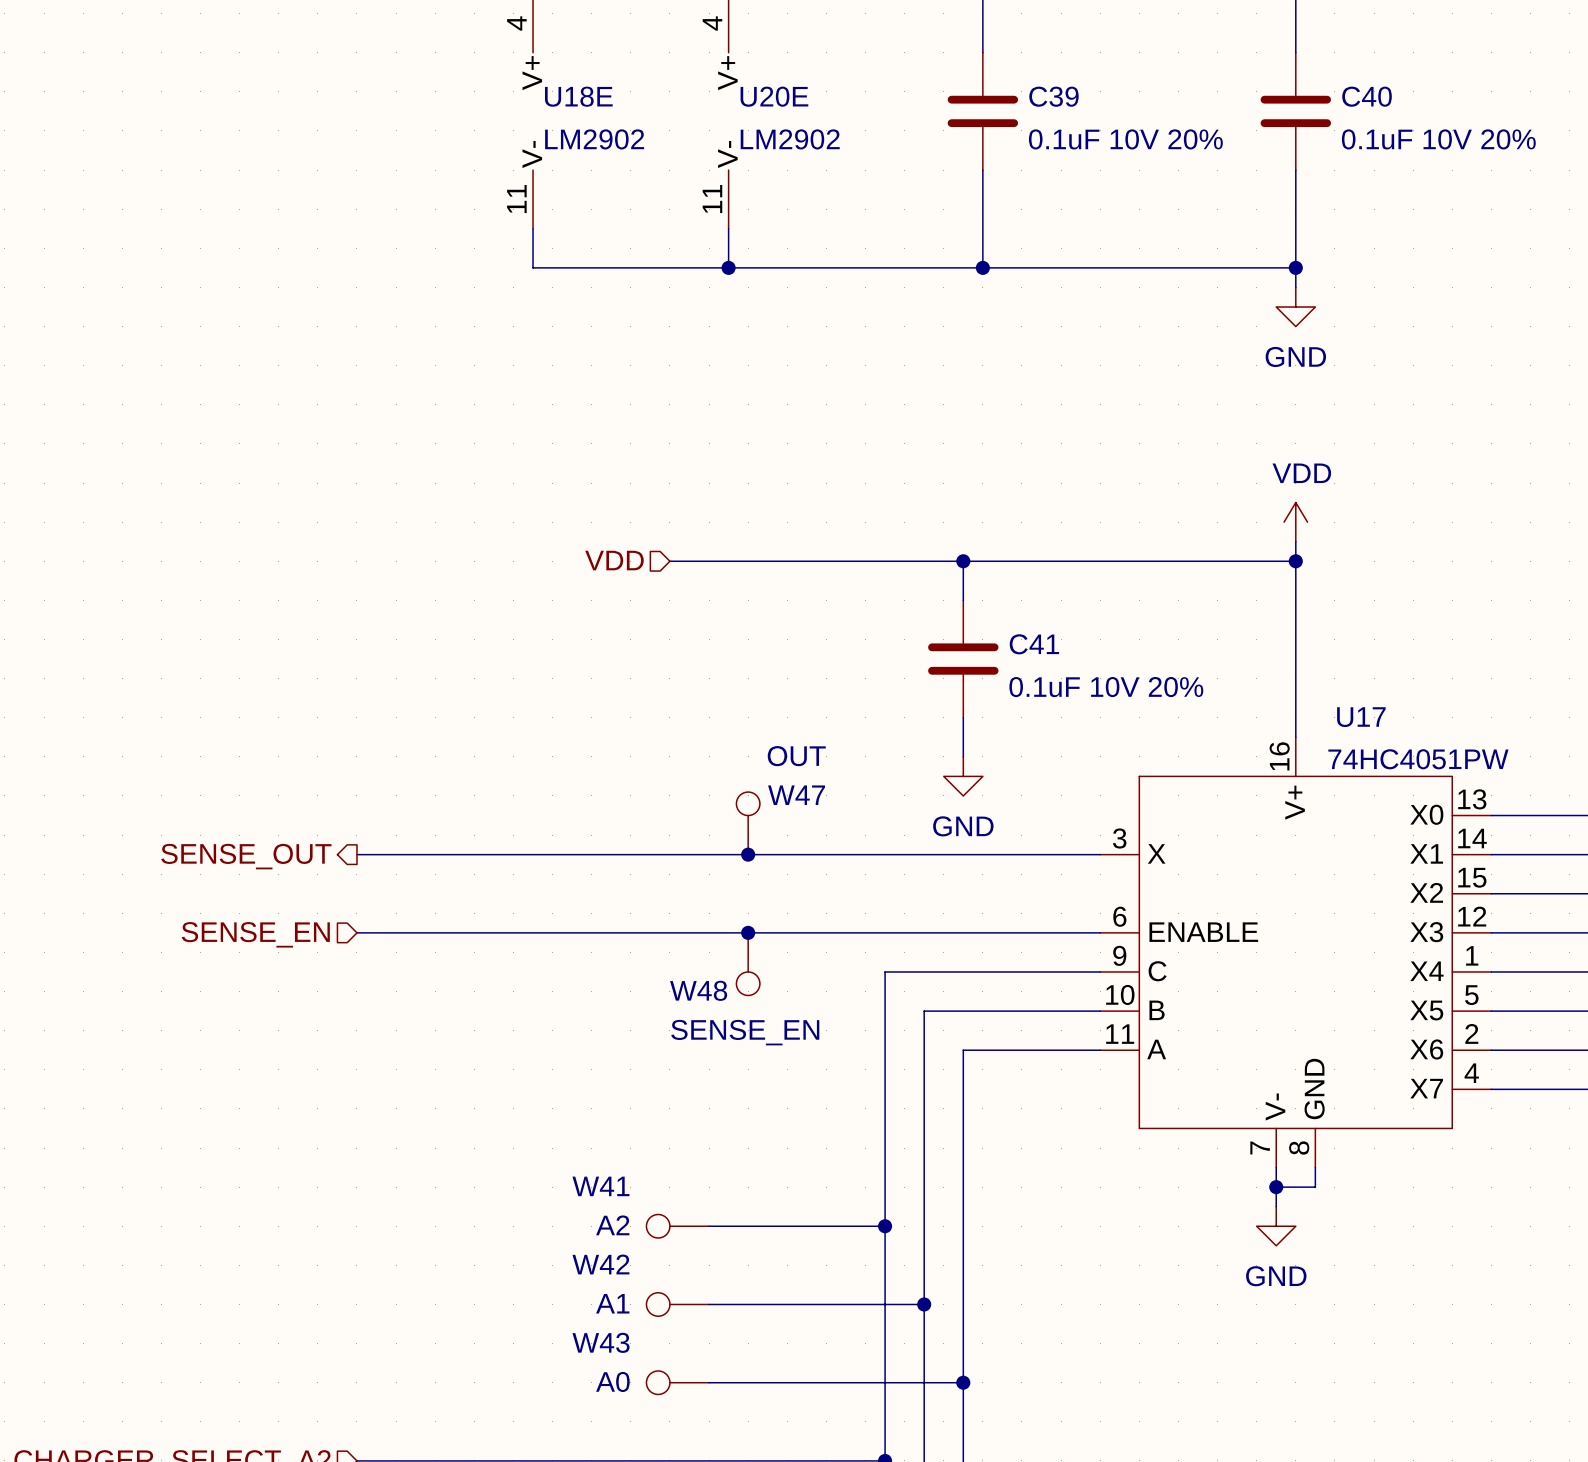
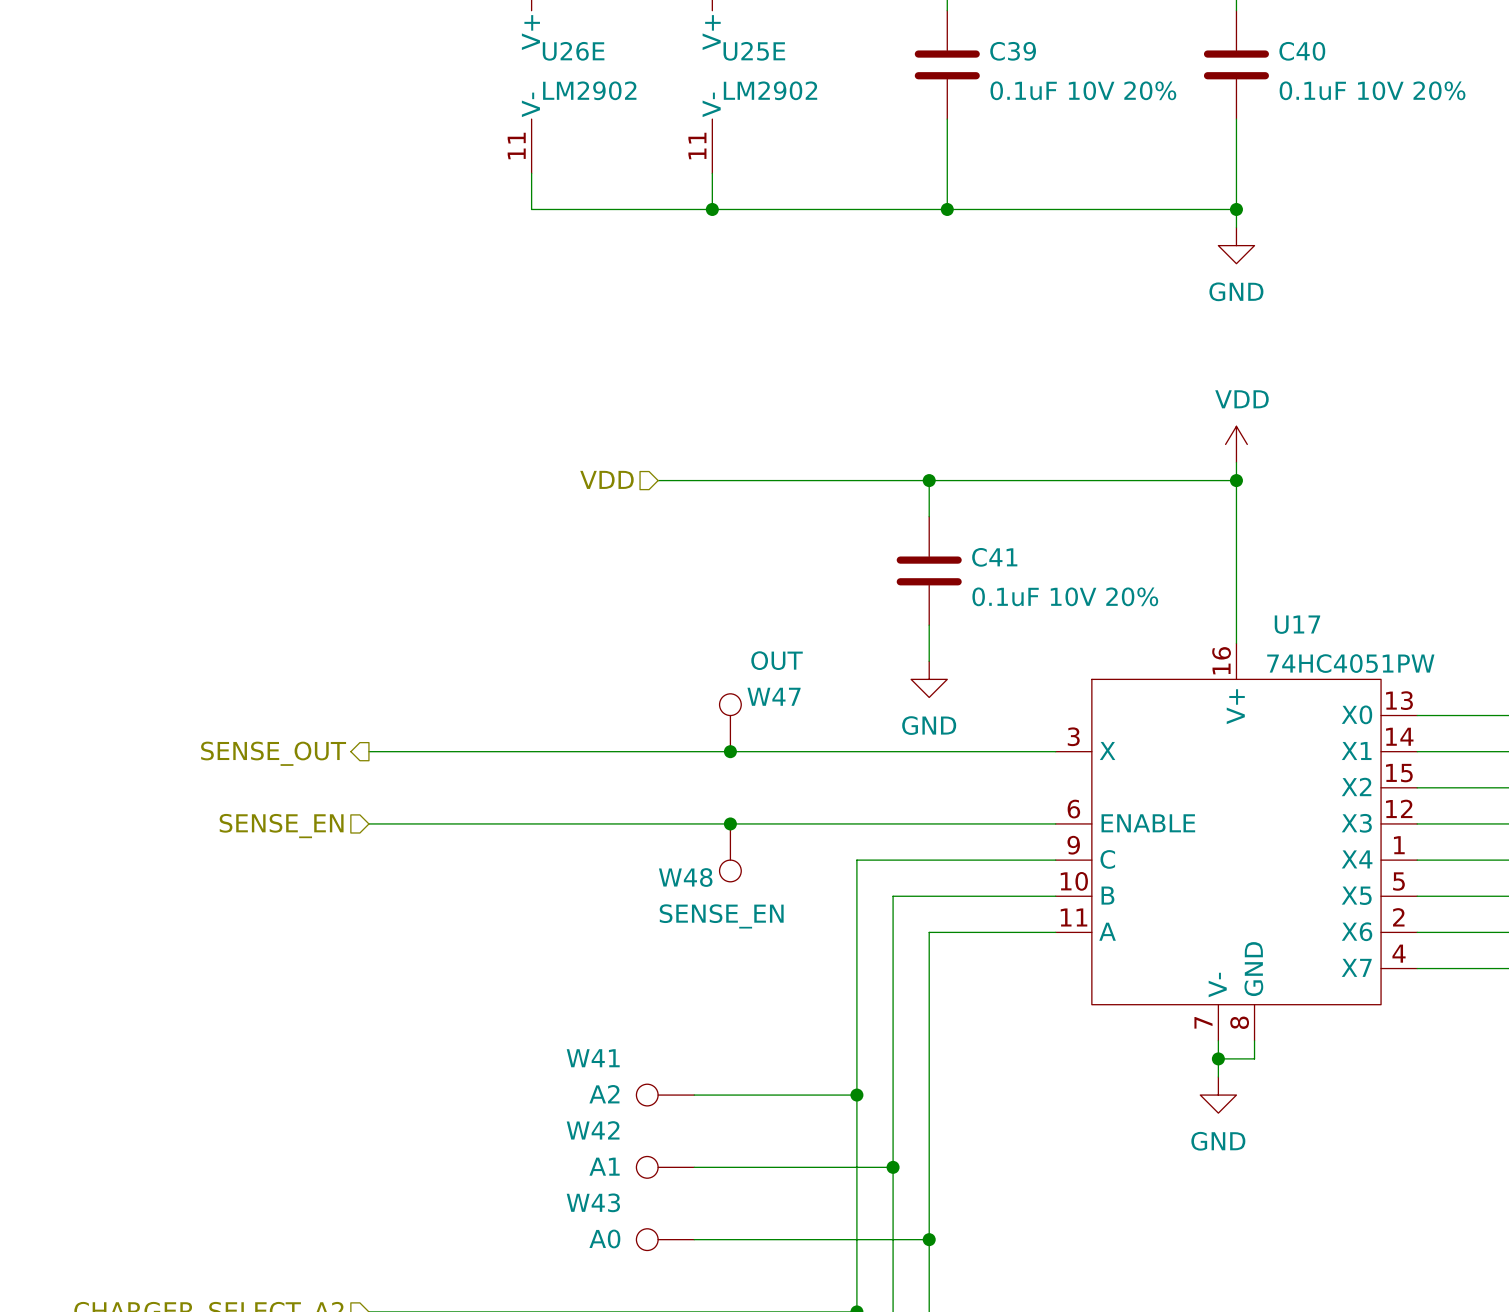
U18E name: U18E (578, 96) -> U26E (573, 51)
U20E name: U20E (774, 96) -> U25E (754, 51)

